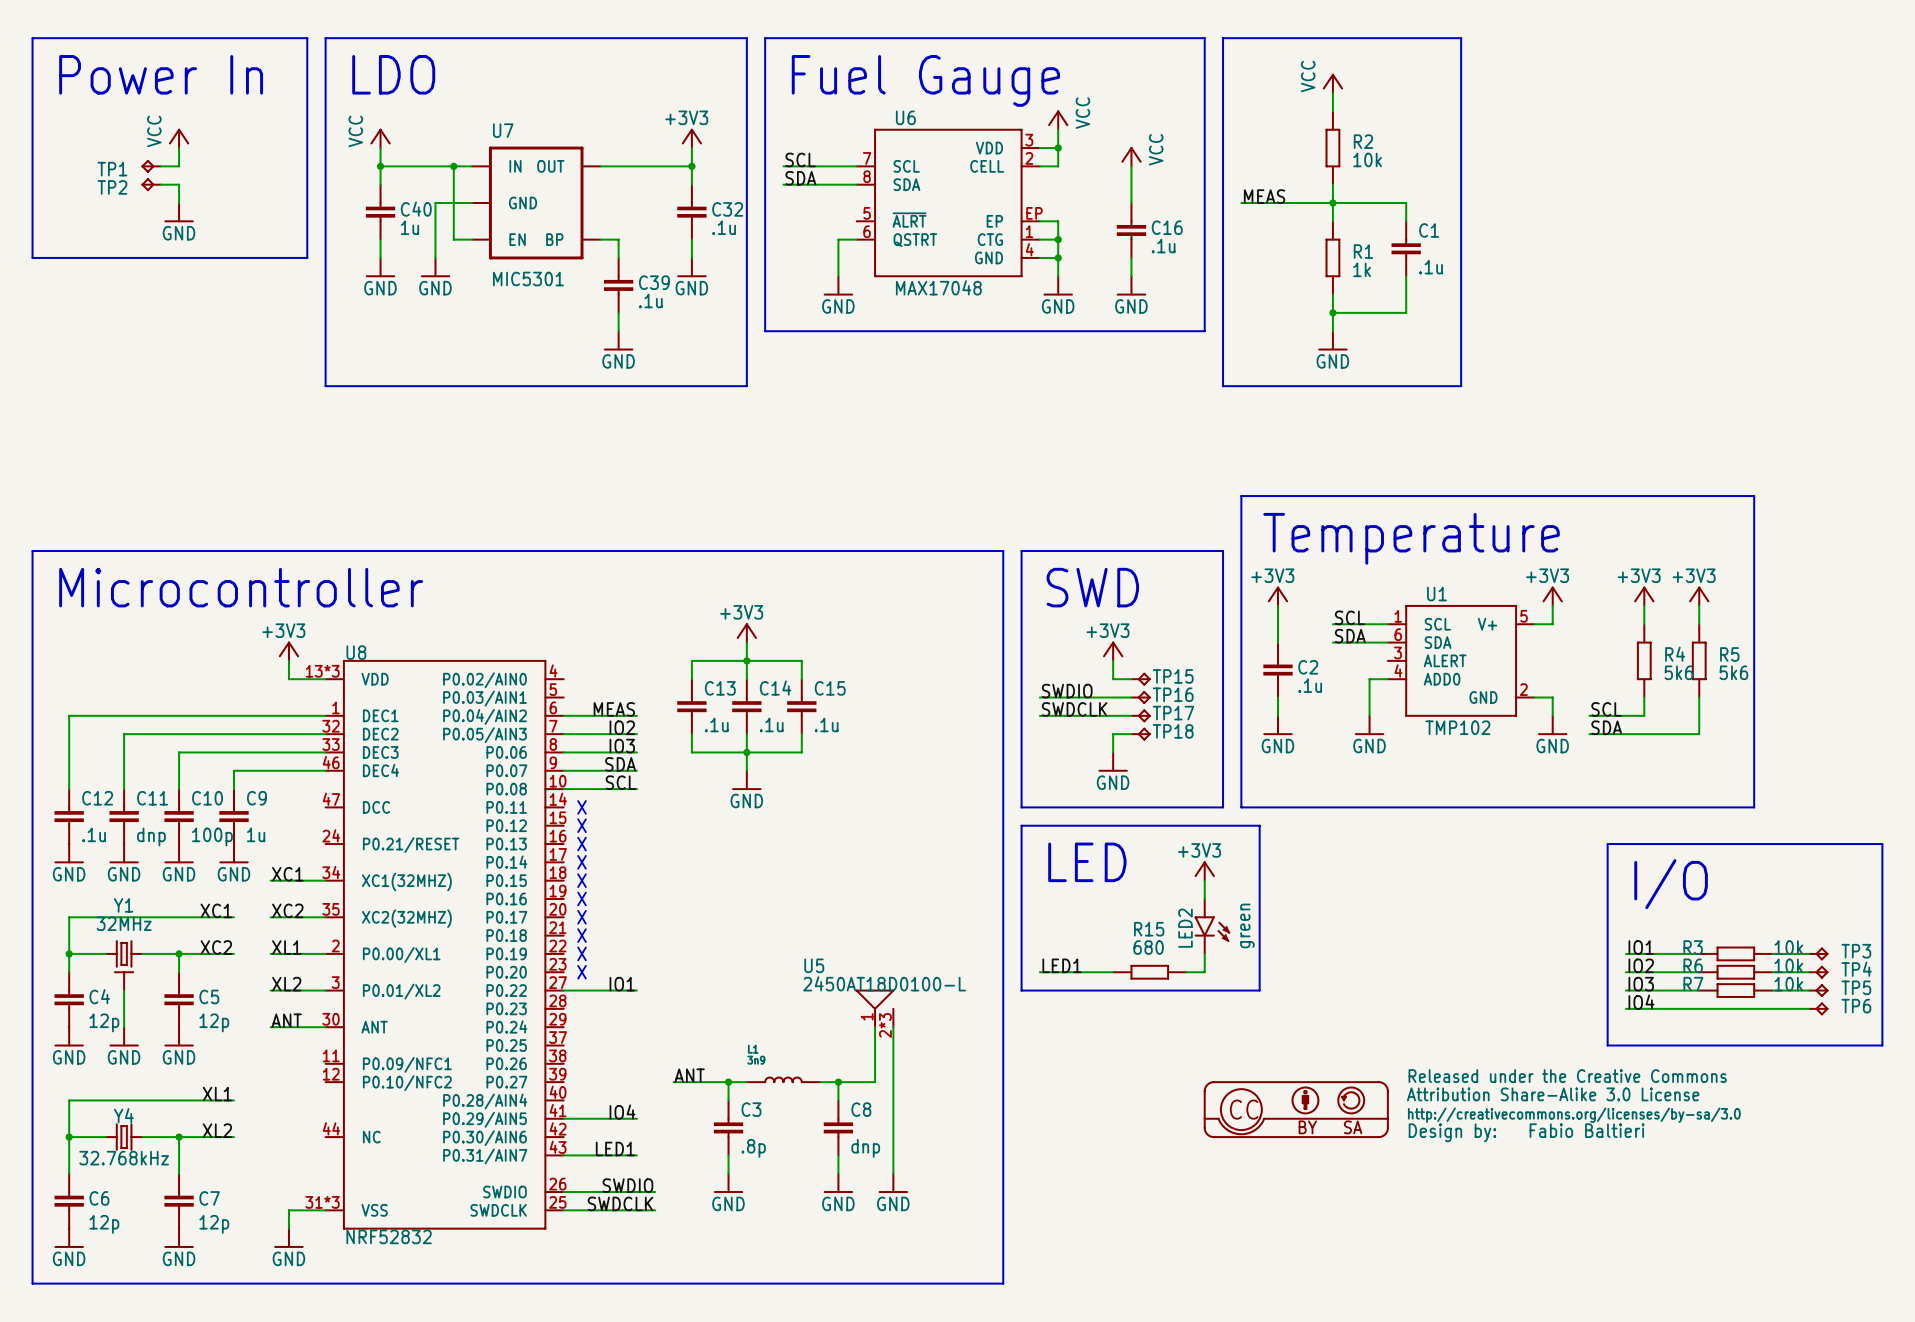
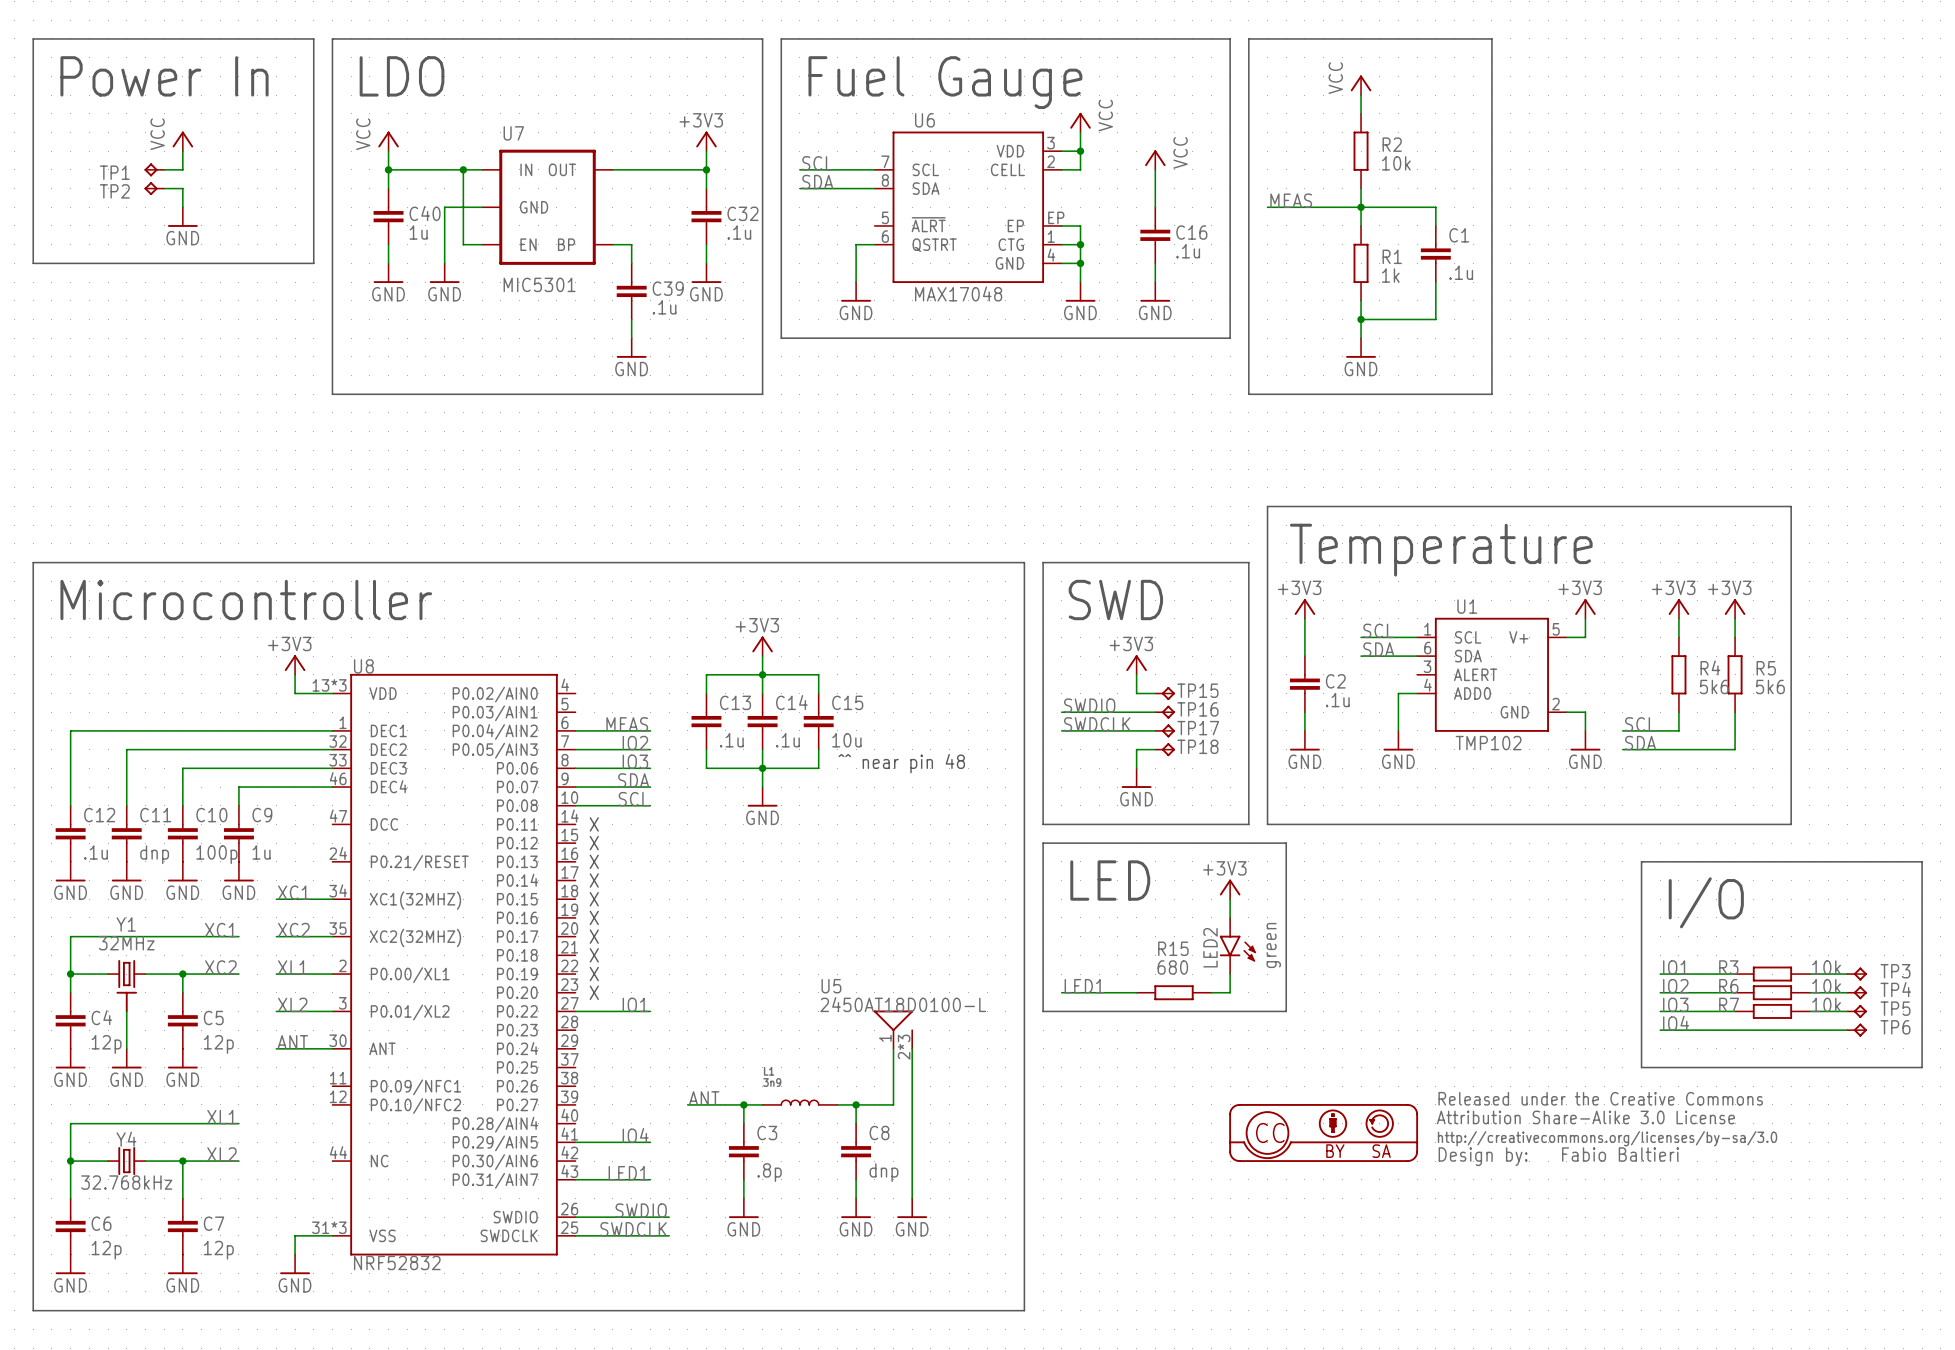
C15 value: .1u (826, 724) -> 10u (846, 740)
text: none -> ^^ near pin 48 (901, 763)

